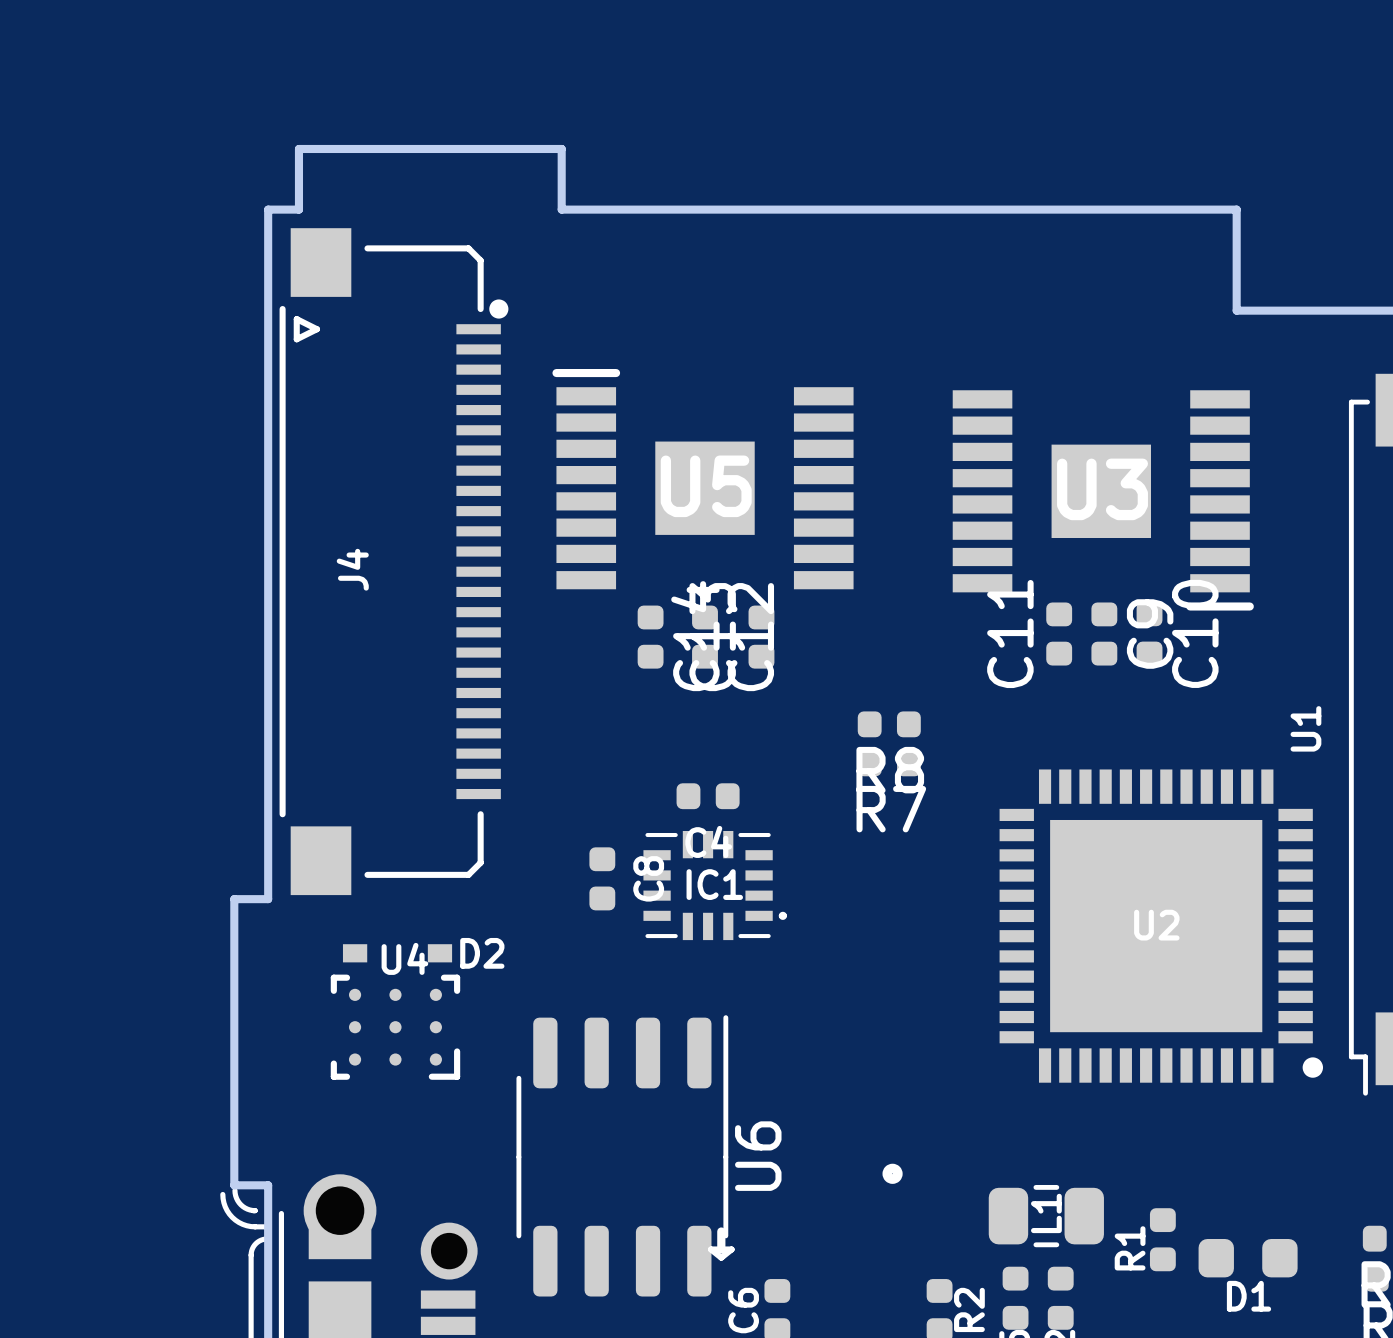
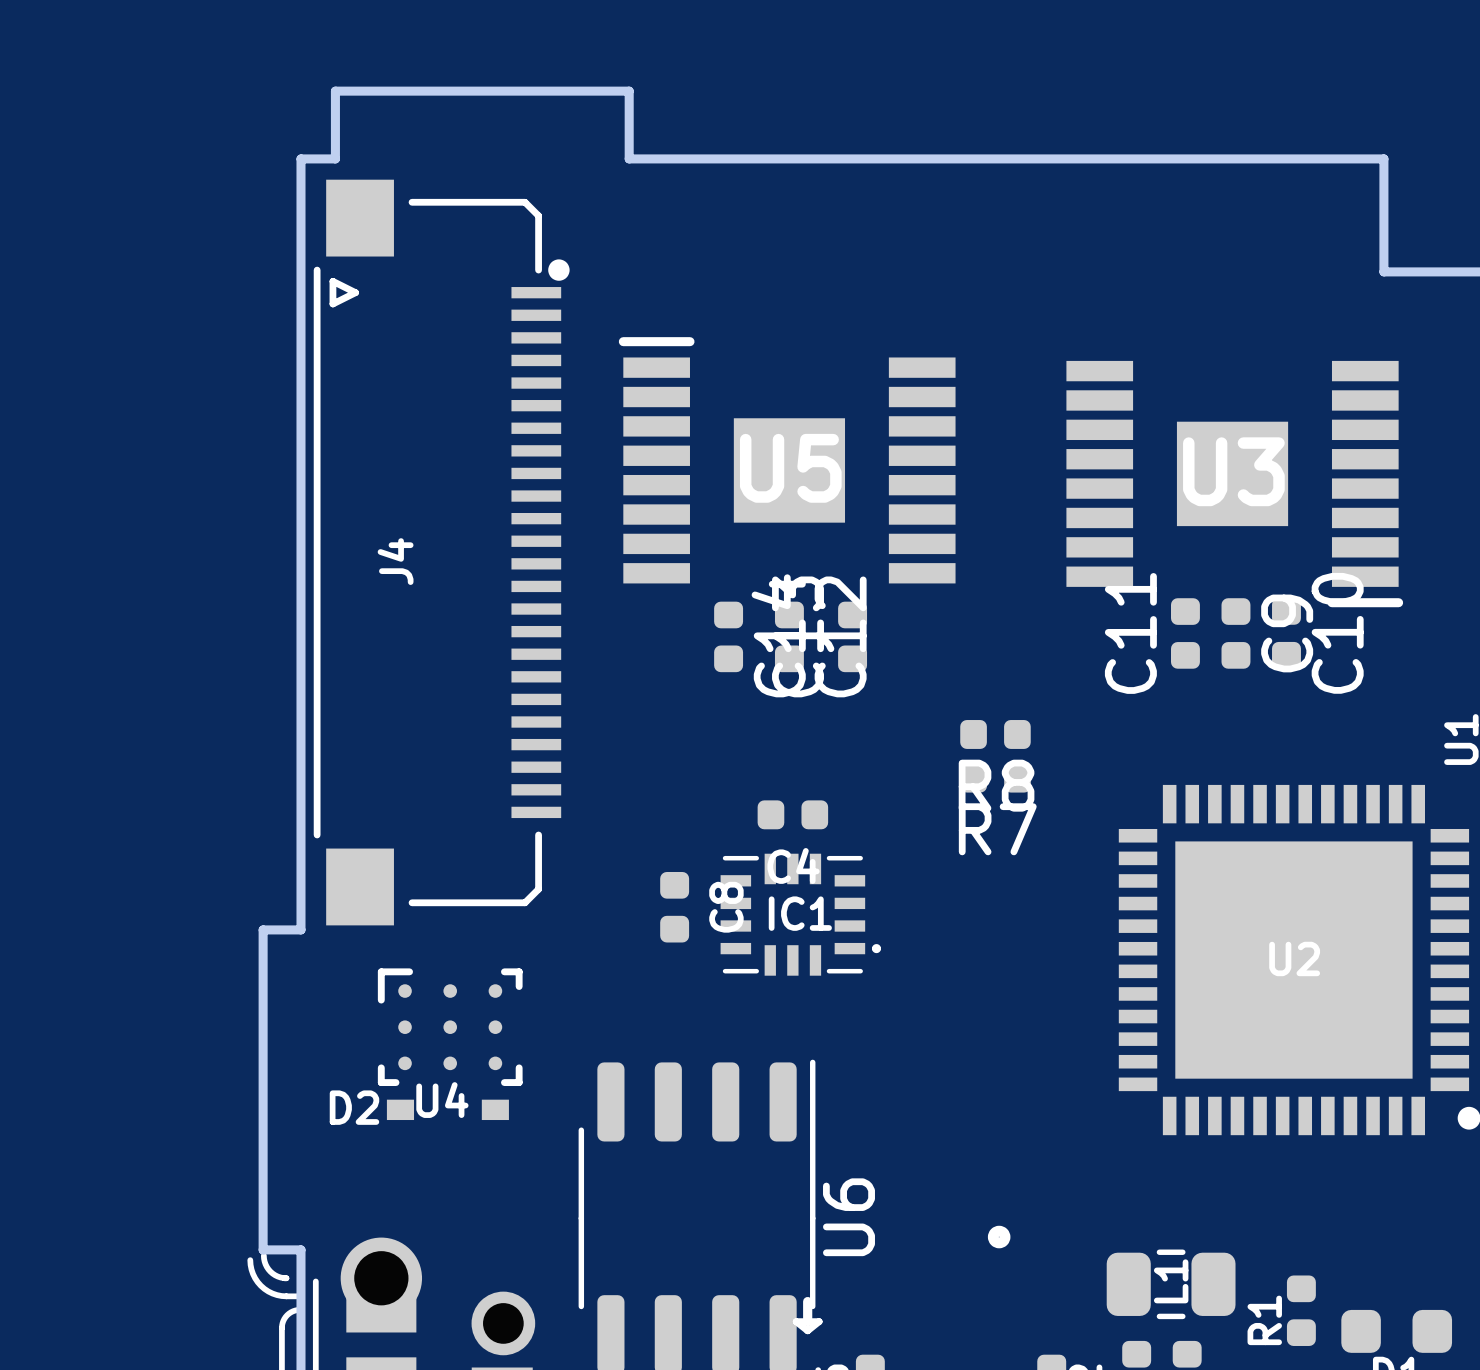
D2 position: (397, 953) -> (447, 1109)
D2 name position: D2 (482, 953) -> D2 (354, 1107)
U4 rotation: 0° (395, 1027) -> 180° (450, 1027)

